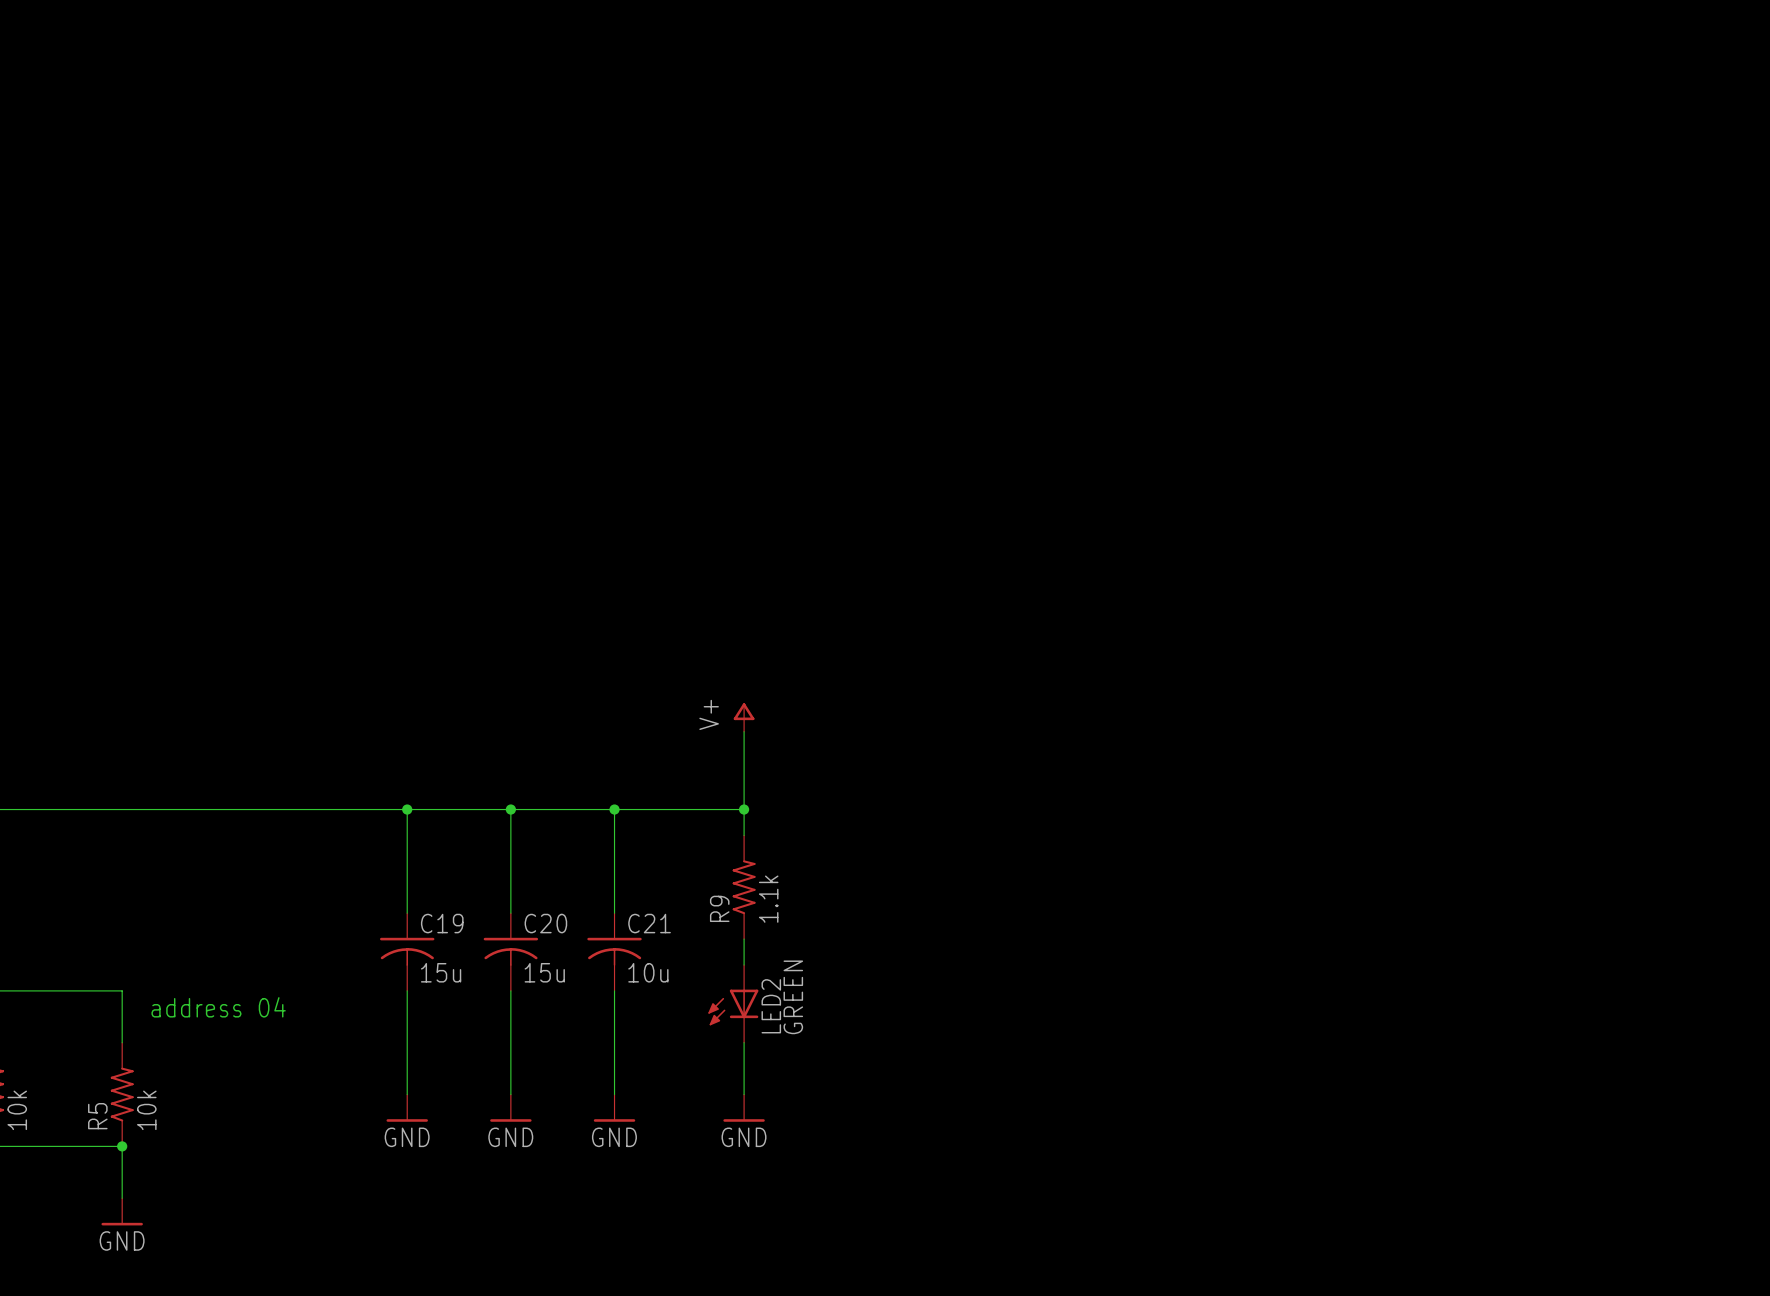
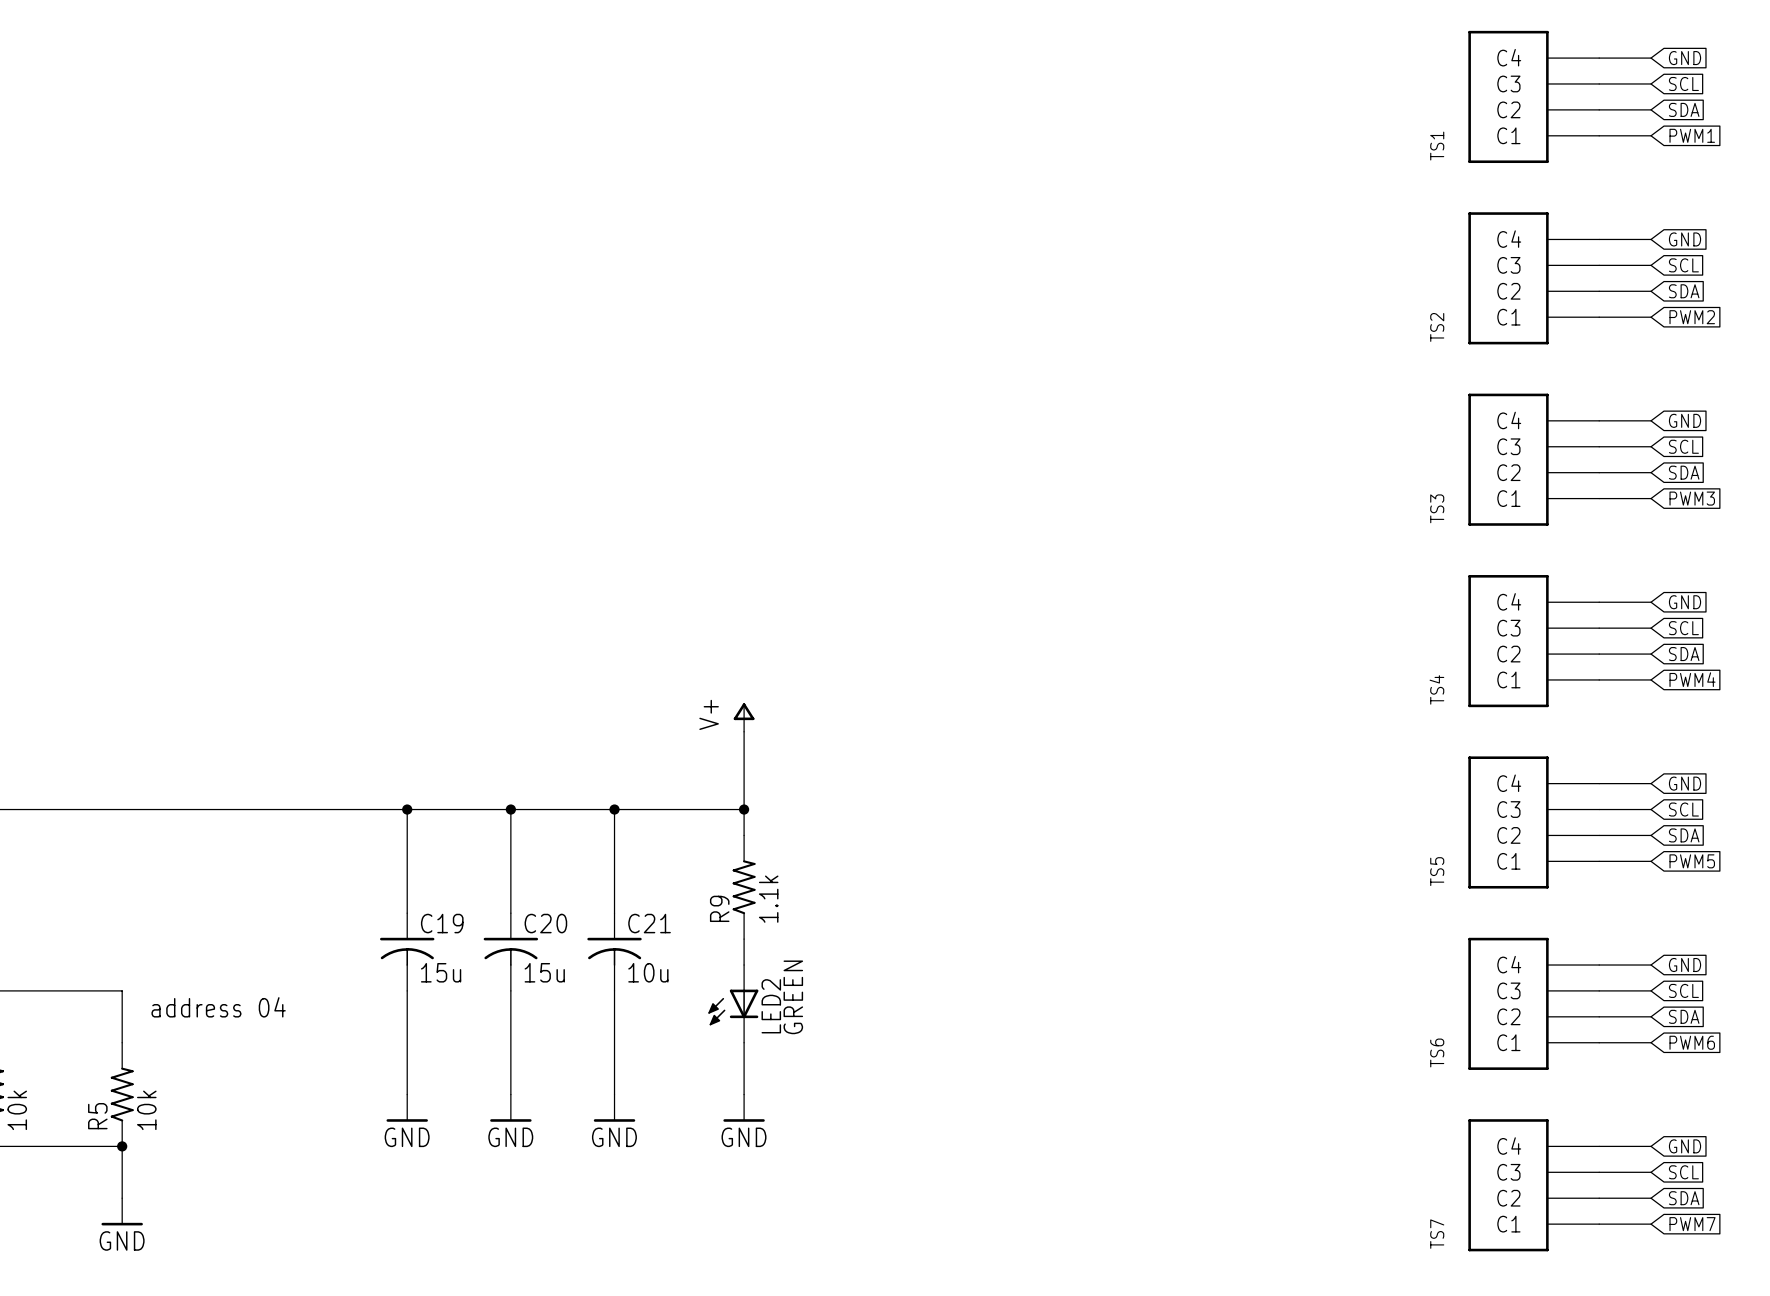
wire: none -> (1599, 58) (1651, 58)
global label: none -> GND (1685, 58)
wire: none -> (1599, 83) (1651, 83)
global label: none -> SCL (1683, 83)
TS1: none -> (1533, 96)
wire: none -> (1599, 109) (1651, 109)
global label: none -> SDA (1684, 109)
wire: none -> (1599, 135) (1651, 135)
global label: none -> PWM1 (1692, 135)
wire: none -> (1599, 239) (1651, 239)
global label: none -> GND (1685, 239)
wire: none -> (1599, 265) (1651, 265)
global label: none -> SCL (1683, 265)
TS2: none -> (1533, 278)
wire: none -> (1599, 291) (1651, 291)
global label: none -> SDA (1684, 291)
wire: none -> (1599, 317) (1651, 317)
global label: none -> PWM2 (1692, 317)
wire: none -> (1599, 420) (1651, 420)
global label: none -> GND (1685, 420)
wire: none -> (1599, 446) (1651, 446)
global label: none -> SCL (1683, 446)
TS3: none -> (1533, 459)
wire: none -> (1599, 472) (1651, 472)
global label: none -> SDA (1684, 472)
wire: none -> (1599, 498) (1651, 498)
global label: none -> PWM3 (1692, 498)
wire: none -> (1599, 602) (1651, 602)
global label: none -> GND (1685, 602)
wire: none -> (1599, 628) (1651, 628)
global label: none -> SCL (1683, 628)
TS4: none -> (1533, 641)
wire: none -> (1599, 654) (1651, 654)
global label: none -> SDA (1684, 654)
wire: none -> (1599, 679) (1651, 679)
global label: none -> PWM4 (1692, 679)
wire: none -> (1599, 783) (1651, 783)
global label: none -> GND (1685, 783)
wire: none -> (1599, 809) (1651, 809)
global label: none -> SCL (1683, 809)
TS5: none -> (1533, 822)
wire: none -> (1599, 835) (1651, 835)
global label: none -> SDA (1684, 835)
wire: none -> (1599, 861) (1651, 861)
global label: none -> PWM5 (1692, 861)
wire: none -> (1599, 965) (1651, 965)
global label: none -> GND (1685, 965)
wire: none -> (1599, 990) (1651, 990)
global label: none -> SCL (1683, 990)
TS6: none -> (1533, 1003)
wire: none -> (1599, 1016) (1651, 1016)
global label: none -> SDA (1684, 1016)
wire: none -> (1599, 1042) (1651, 1042)
global label: none -> PWM6 (1692, 1042)
wire: none -> (1599, 1146) (1651, 1146)
global label: none -> GND (1685, 1146)
wire: none -> (1599, 1172) (1651, 1172)
global label: none -> SCL (1683, 1172)
TS7: none -> (1533, 1185)
wire: none -> (1599, 1198) (1651, 1198)
global label: none -> SDA (1684, 1198)
wire: none -> (1599, 1224) (1651, 1224)
global label: none -> PWM7 (1692, 1224)

